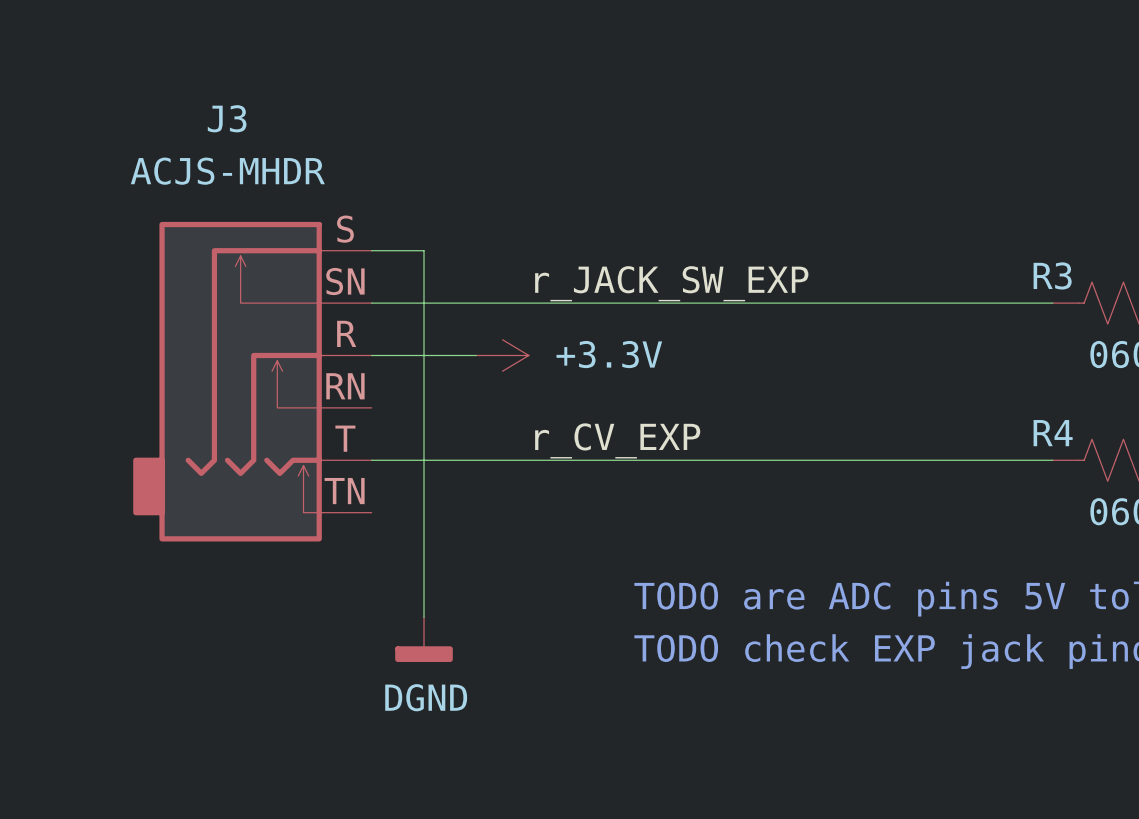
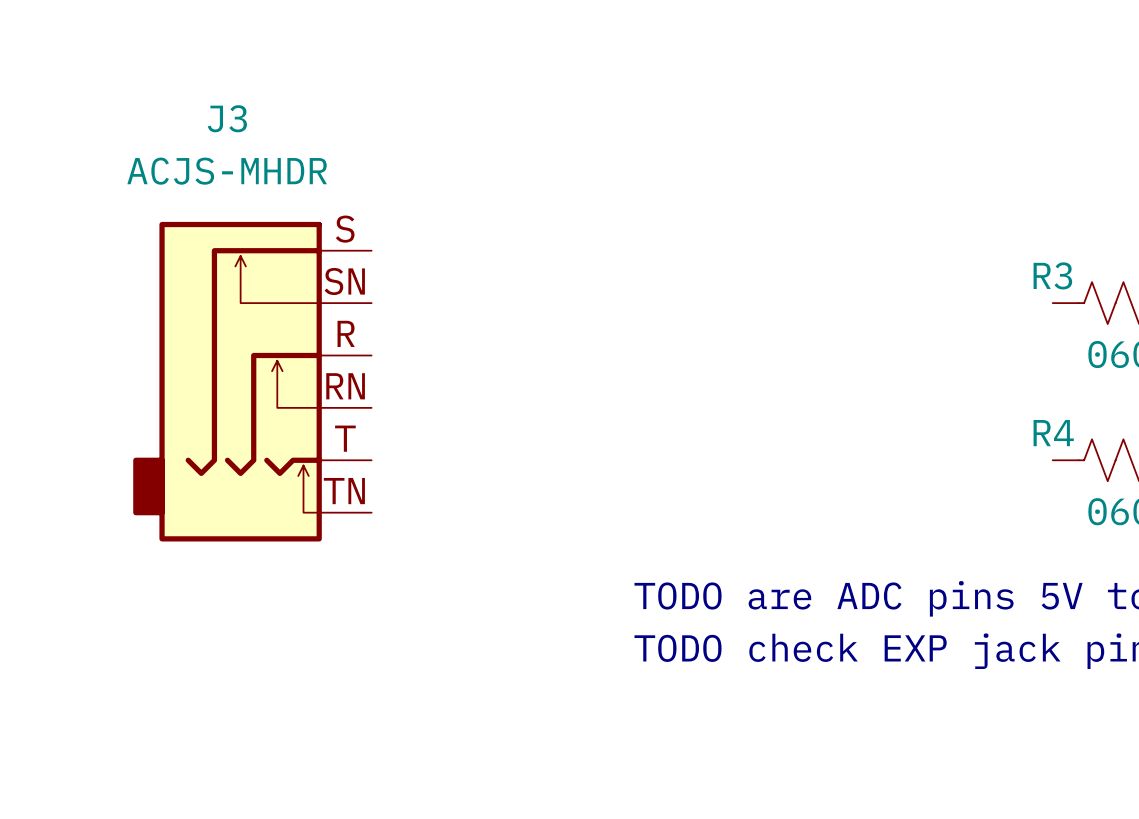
wire: (371, 250) (424, 250) (424, 617) -> none
label: r_JACK_SW_EXP (671, 283) -> none
wire: (371, 303) (1052, 303) -> none
wire: (371, 355) (476, 355) -> none
power symbol: +3.3V (502, 355) -> none
label: r_CV_EXP (617, 440) -> none
wire: (371, 460) (1052, 460) -> none
power symbol: DGND (424, 639) -> none

